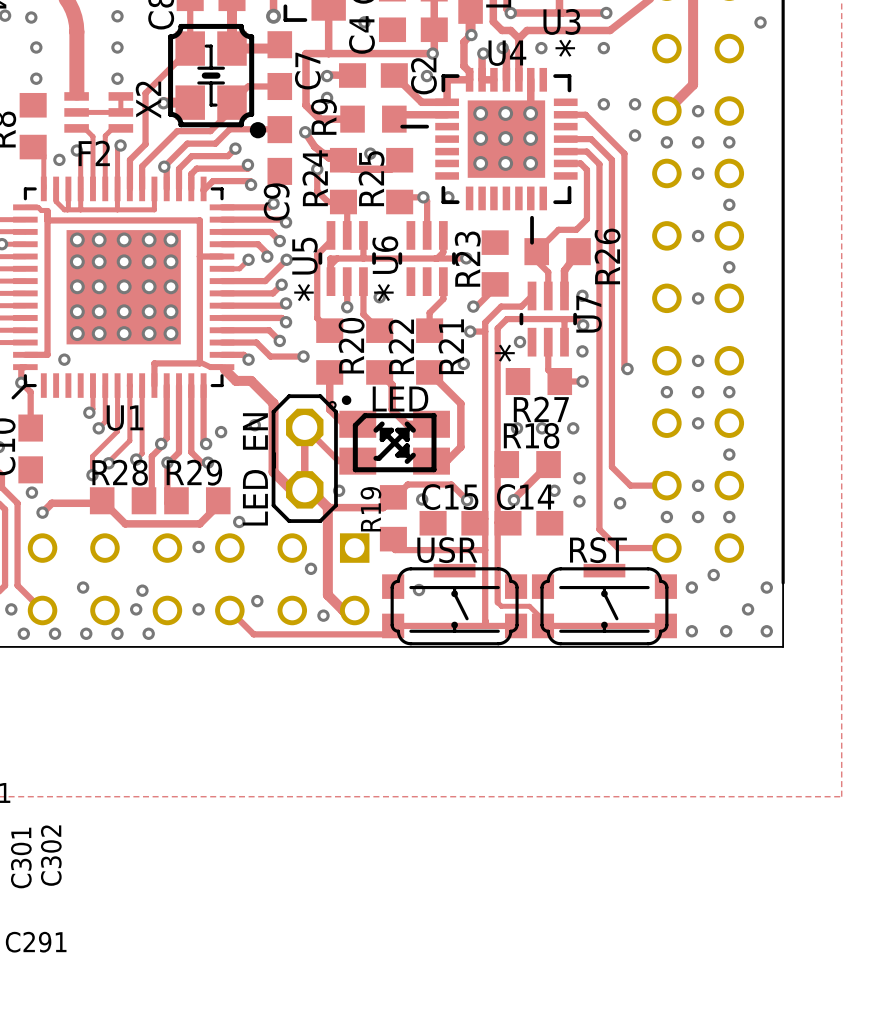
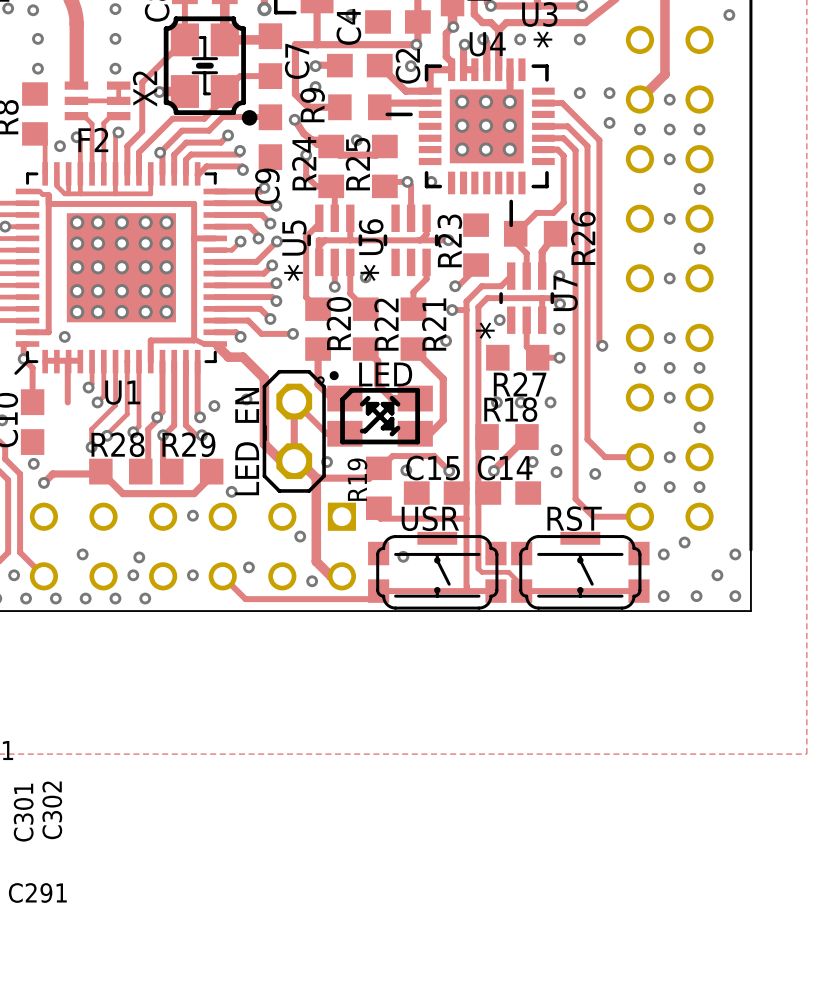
track: none -> (67, 360) (67, 402)
track: none -> (79, 360) (45, 361)

